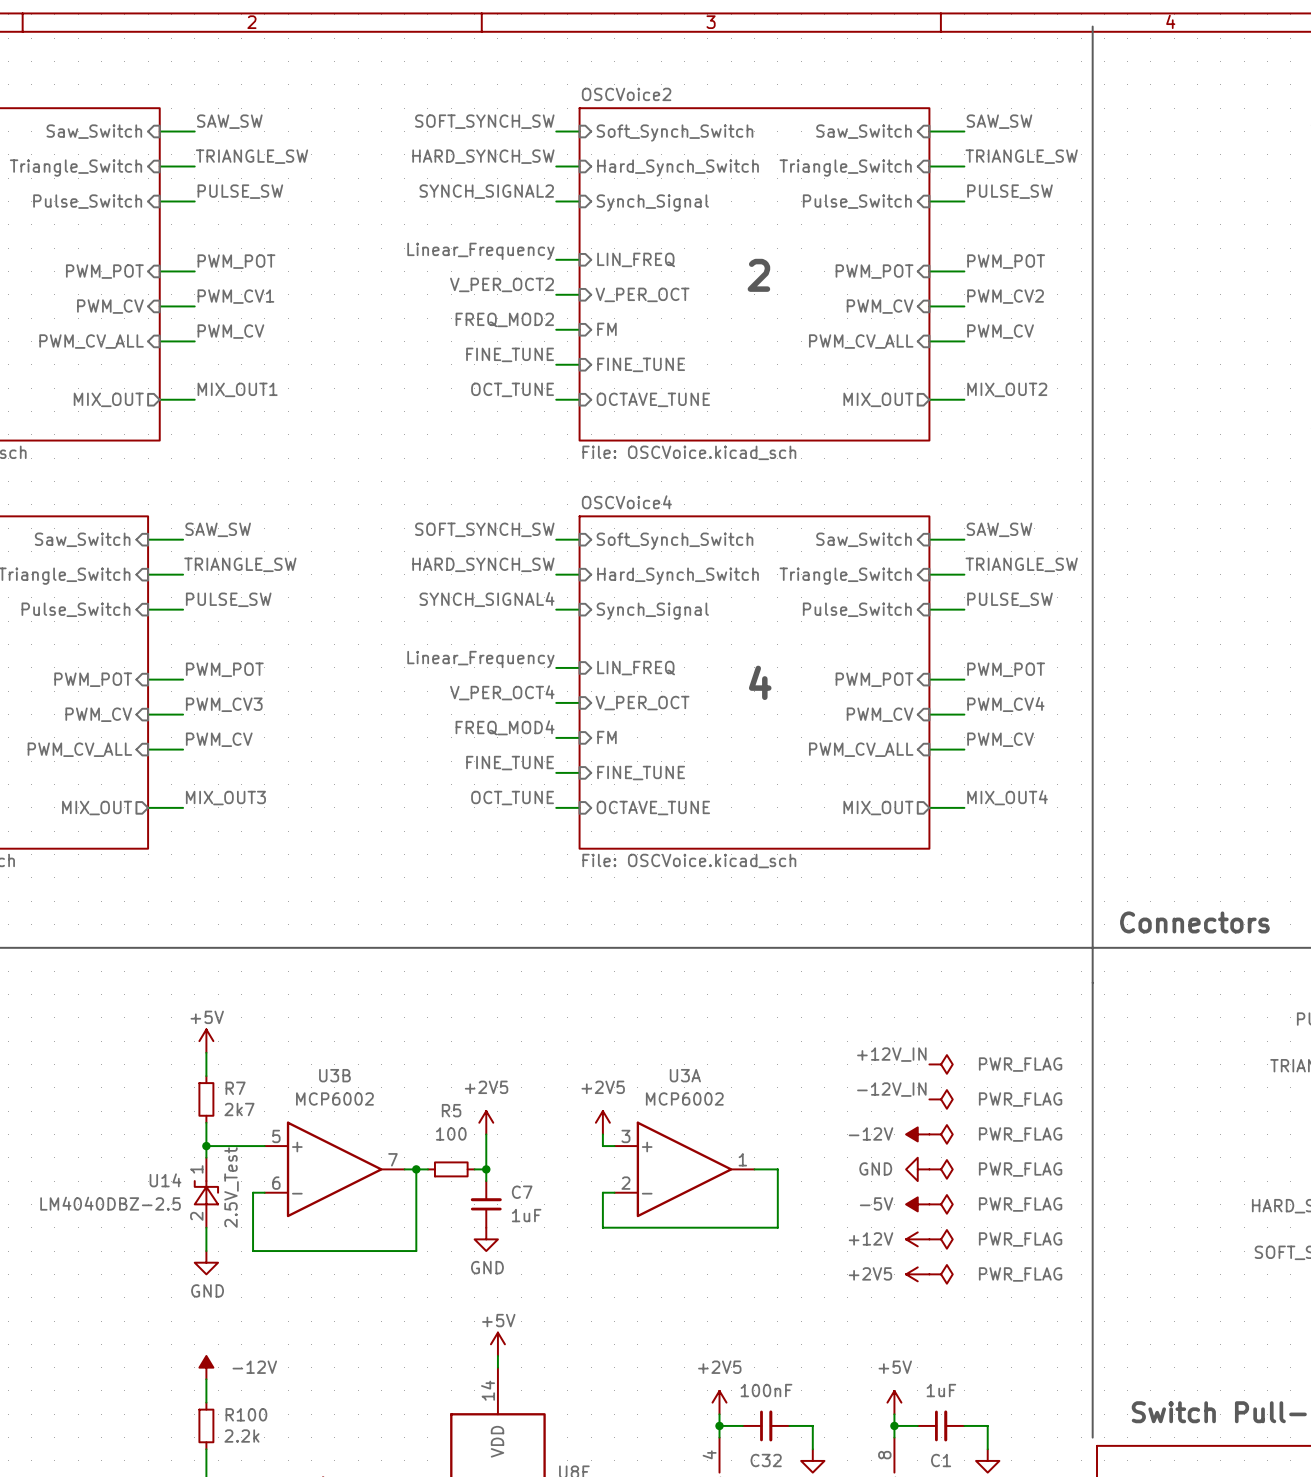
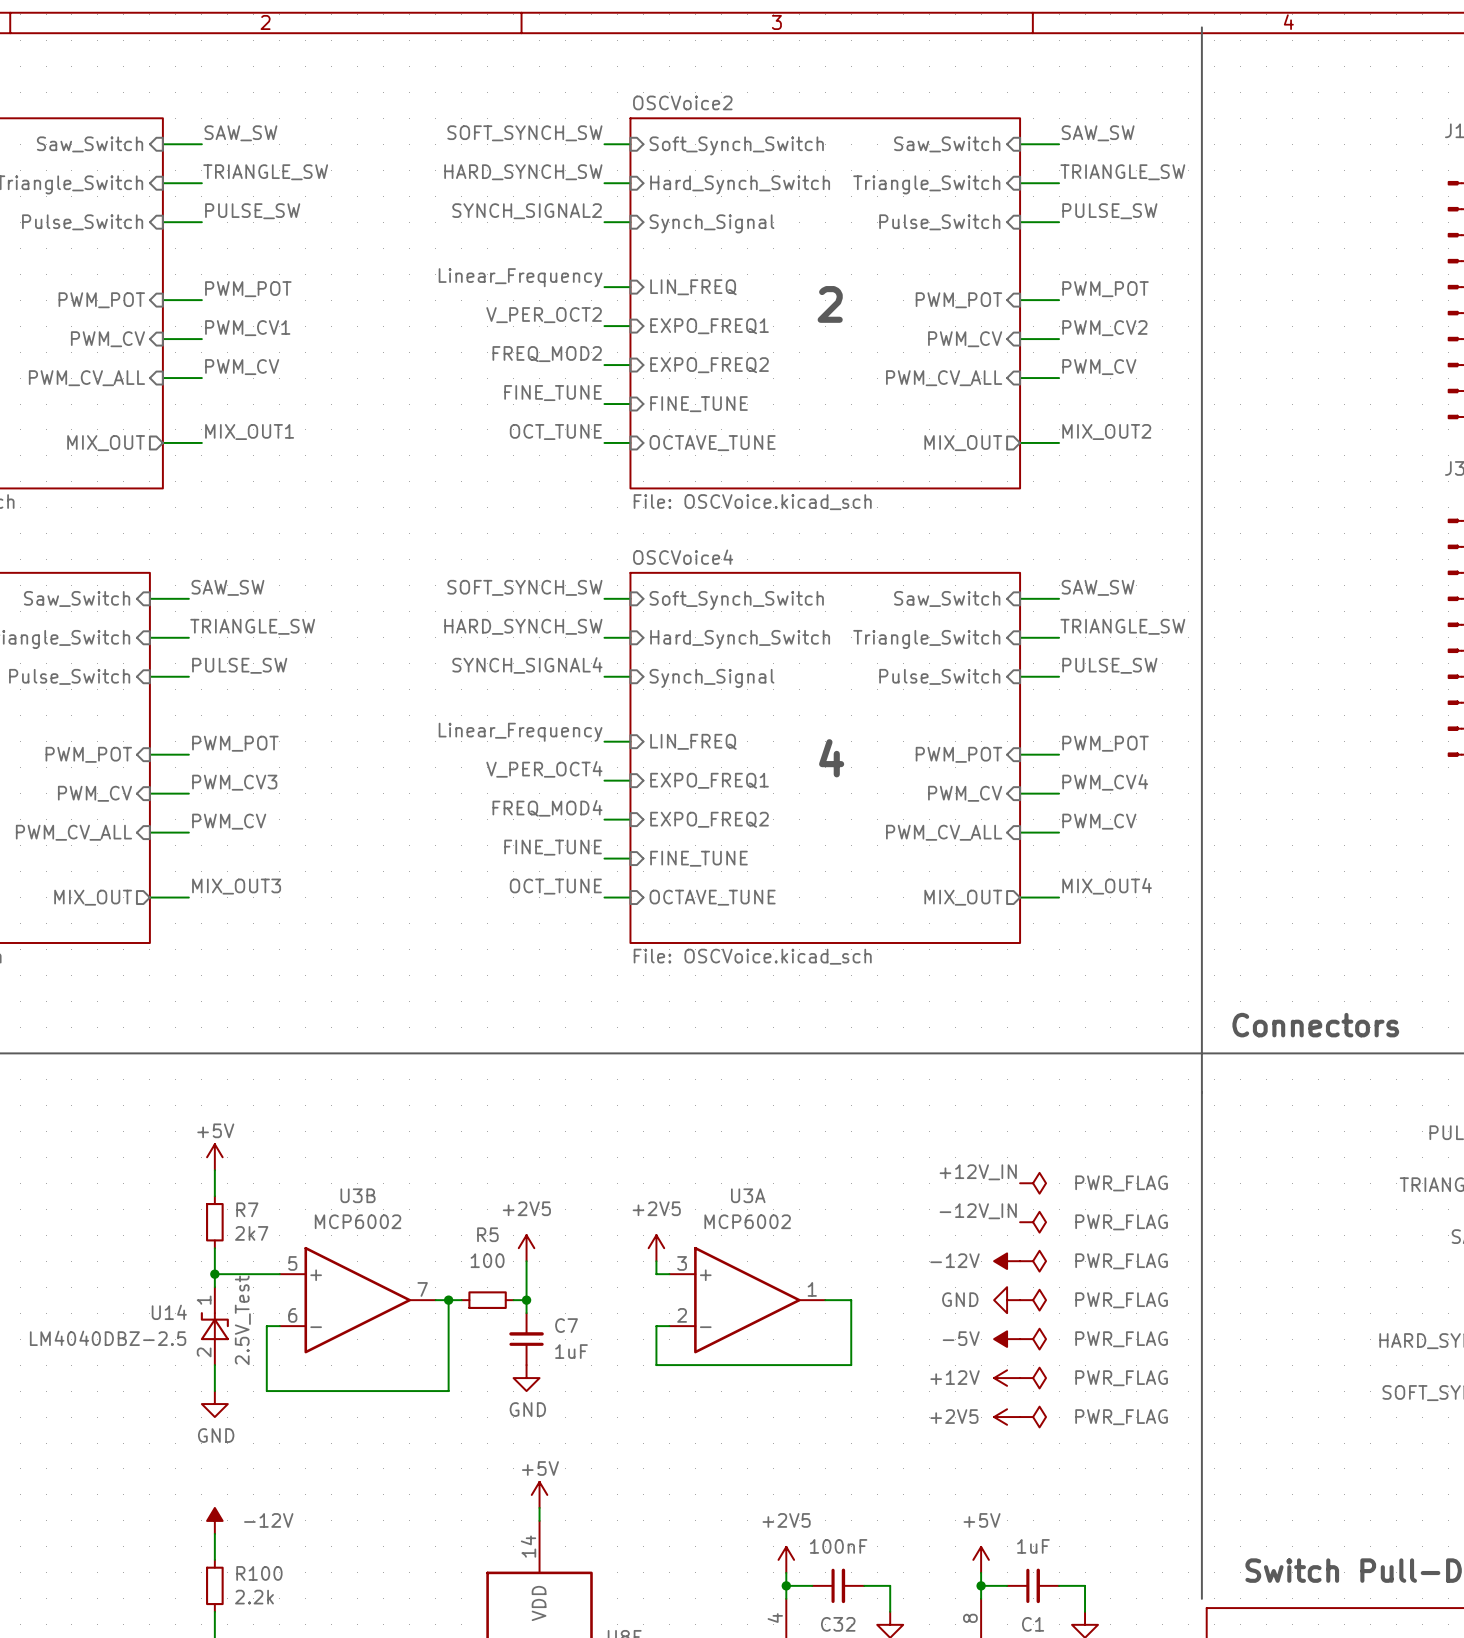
sheet pin: V_PER_OCT (642, 294) -> EXPO_FREQ1 (709, 326)
sheet pin: FM (606, 329) -> EXPO_FREQ2 (709, 365)
sheet pin: V_PER_OCT (642, 703) -> EXPO_FREQ1 (709, 780)
sheet pin: FM (606, 737) -> EXPO_FREQ2 (709, 819)

